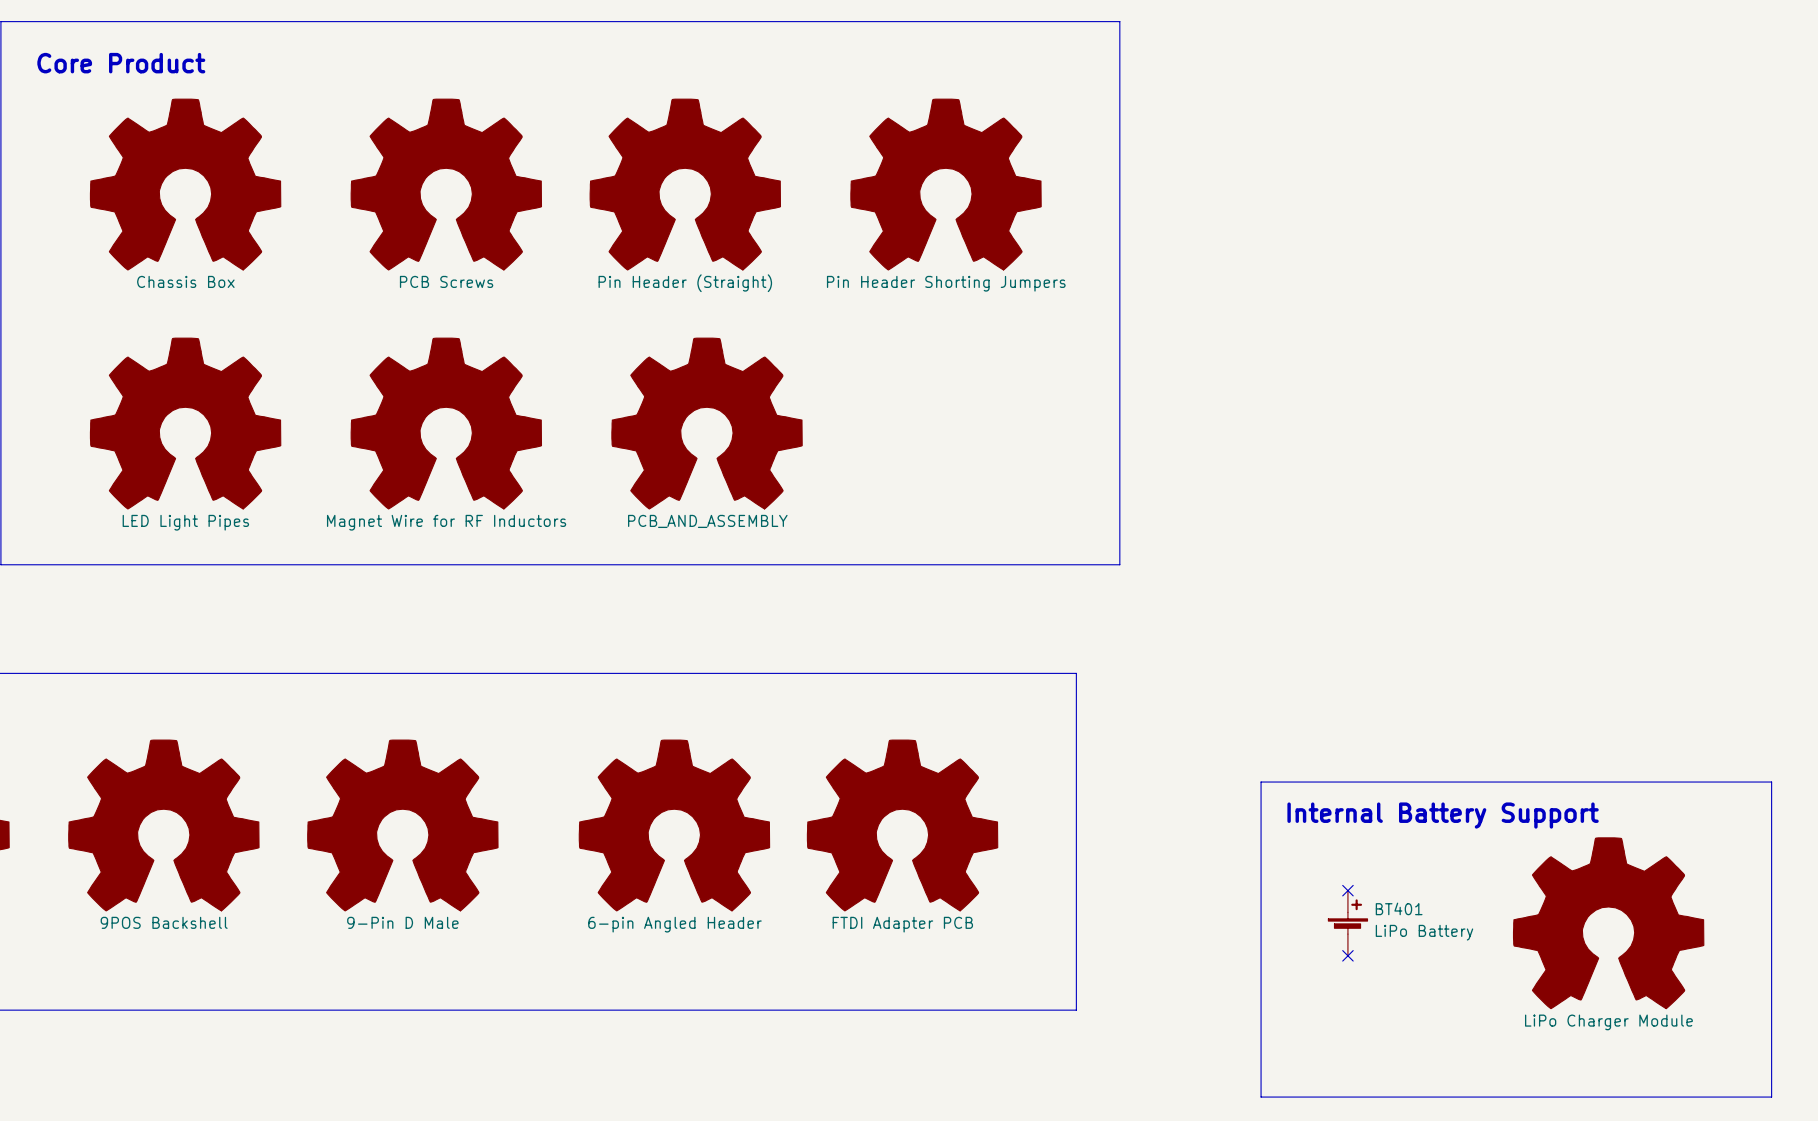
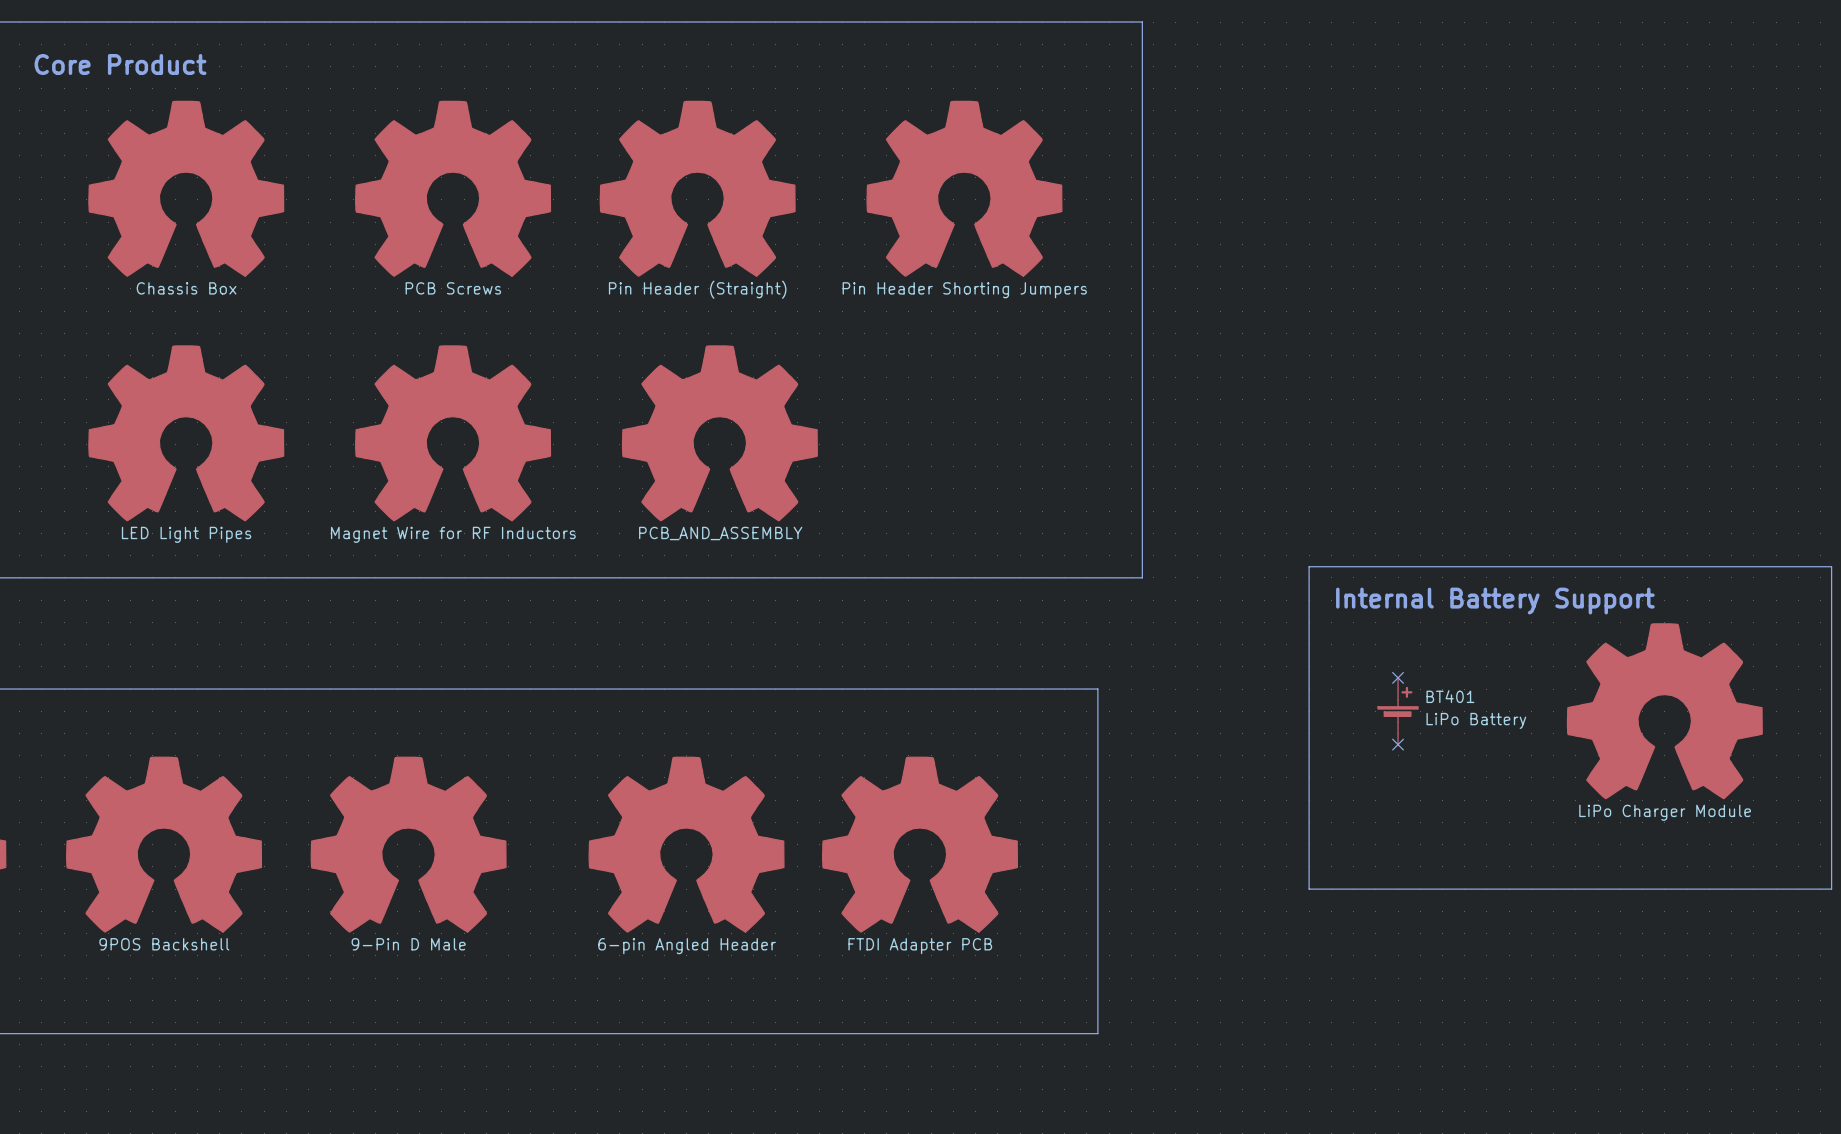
line: none -> (1309, 566) (1831, 566) (1831, 889) (1309, 889) (1309, 566)
text: none -> Internal Battery Support (1495, 601)
no-connect mark: none -> (1398, 677)
part: none -> LiPo Charger Module (1664, 711)
no-connect mark: none -> (1398, 744)
line: (1261, 782) (1771, 782) (1771, 1097) (1261, 1097) (1261, 782) -> none
text: Internal Battery Support (1443, 815) -> none
no-connect mark: (1347, 890) -> none
BT401 position: (1347, 923) -> (1398, 711)
part: LiPo Charger Module (1608, 923) -> none
no-connect mark: (1347, 955) -> none

